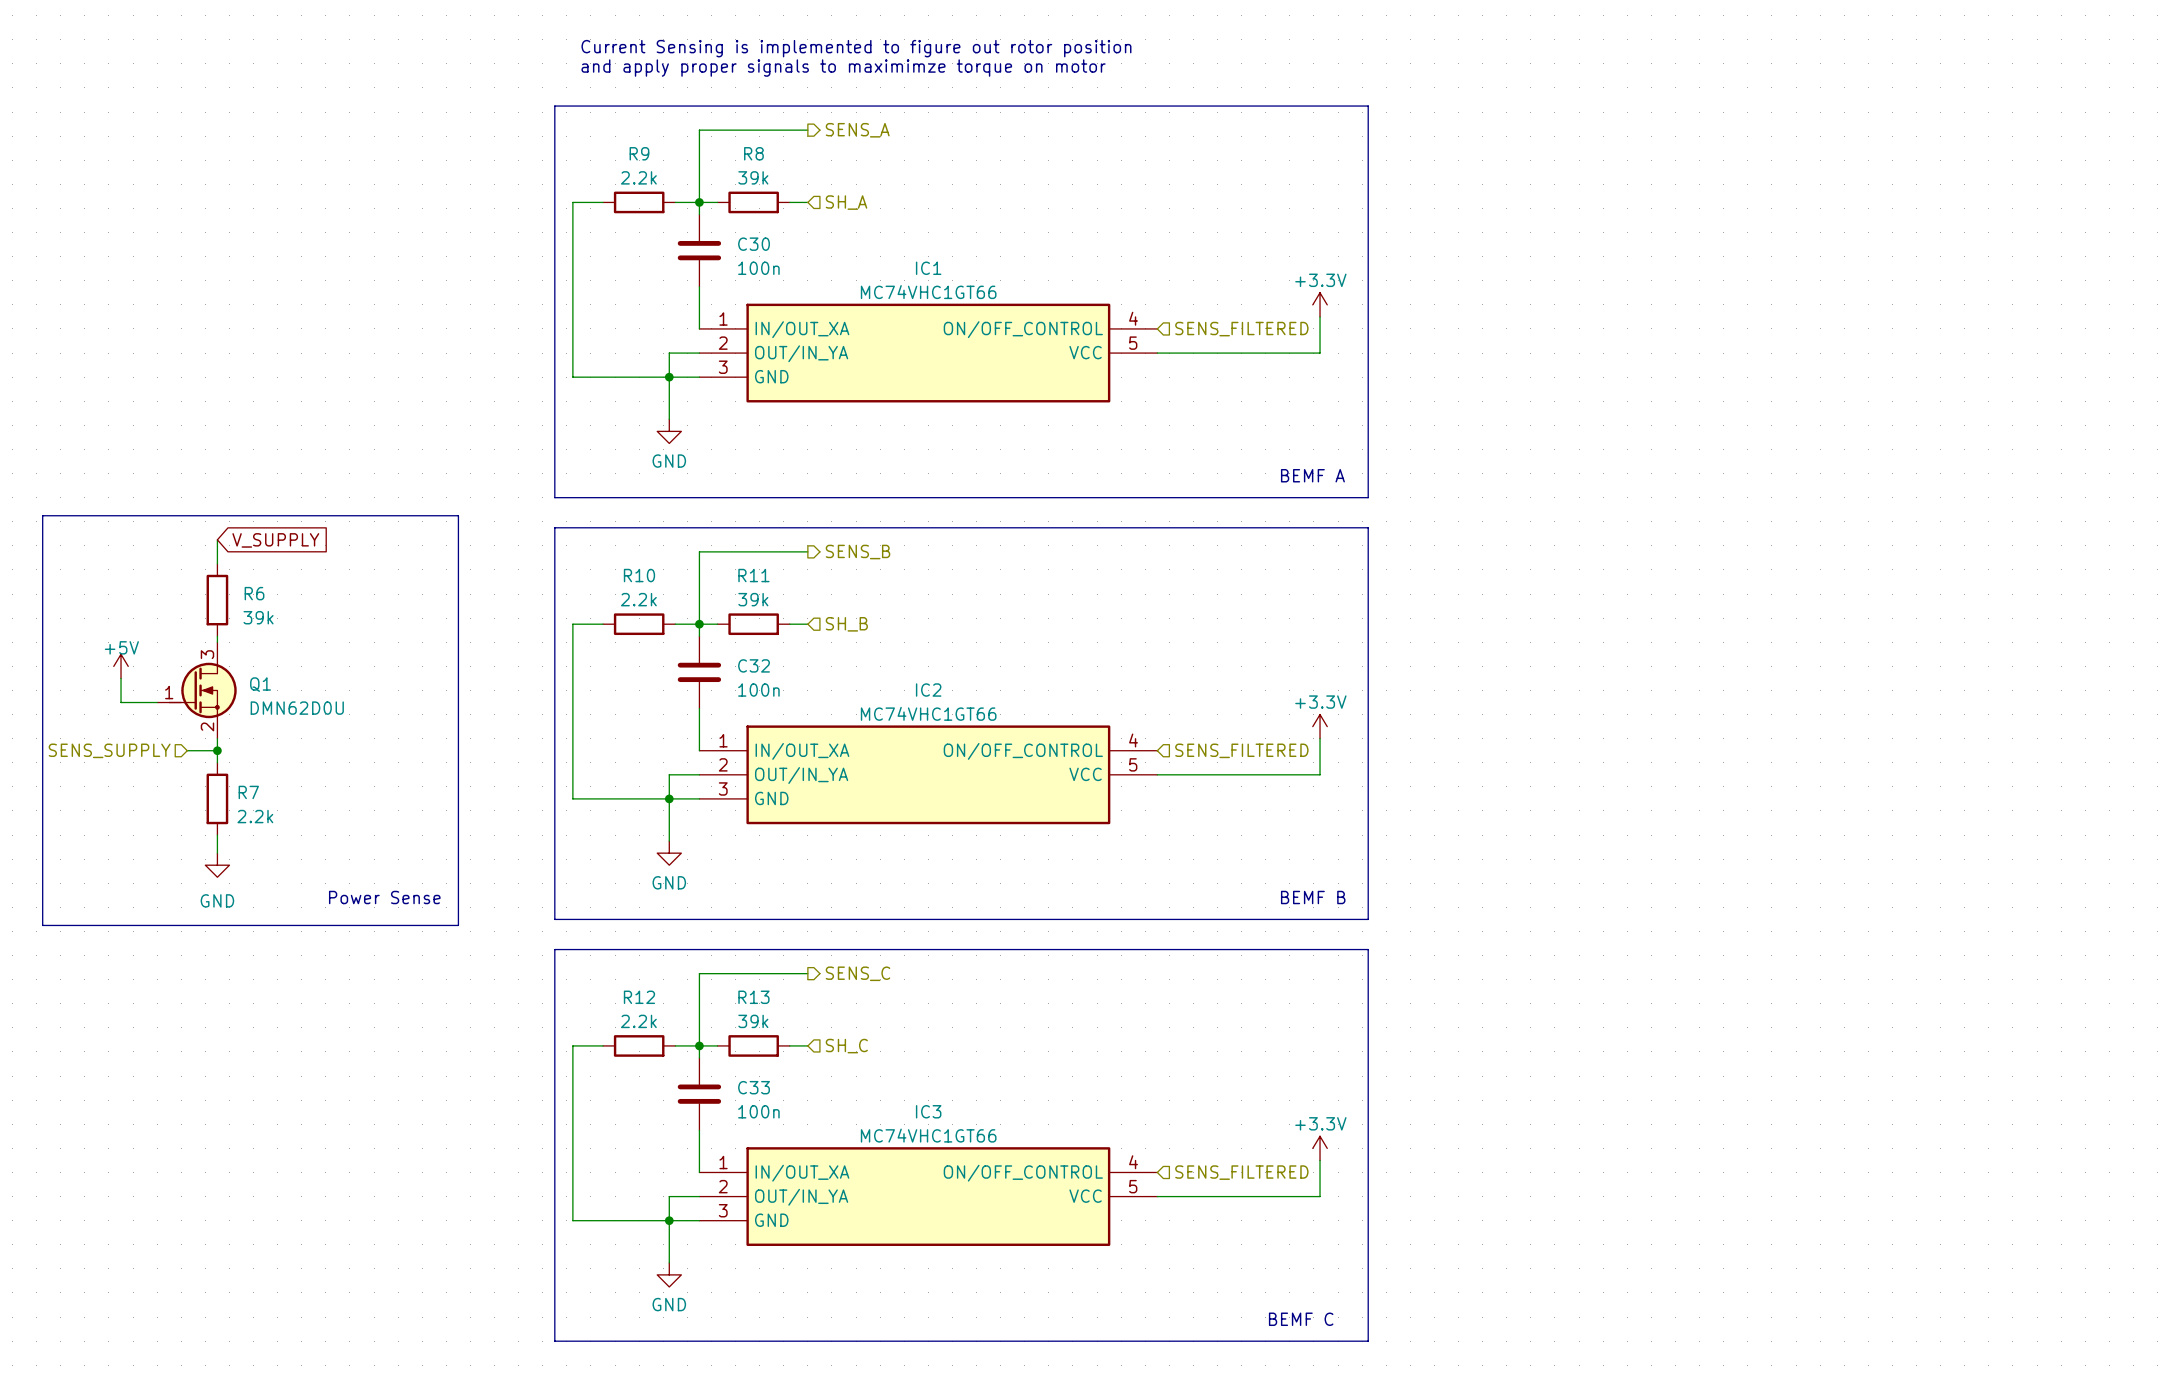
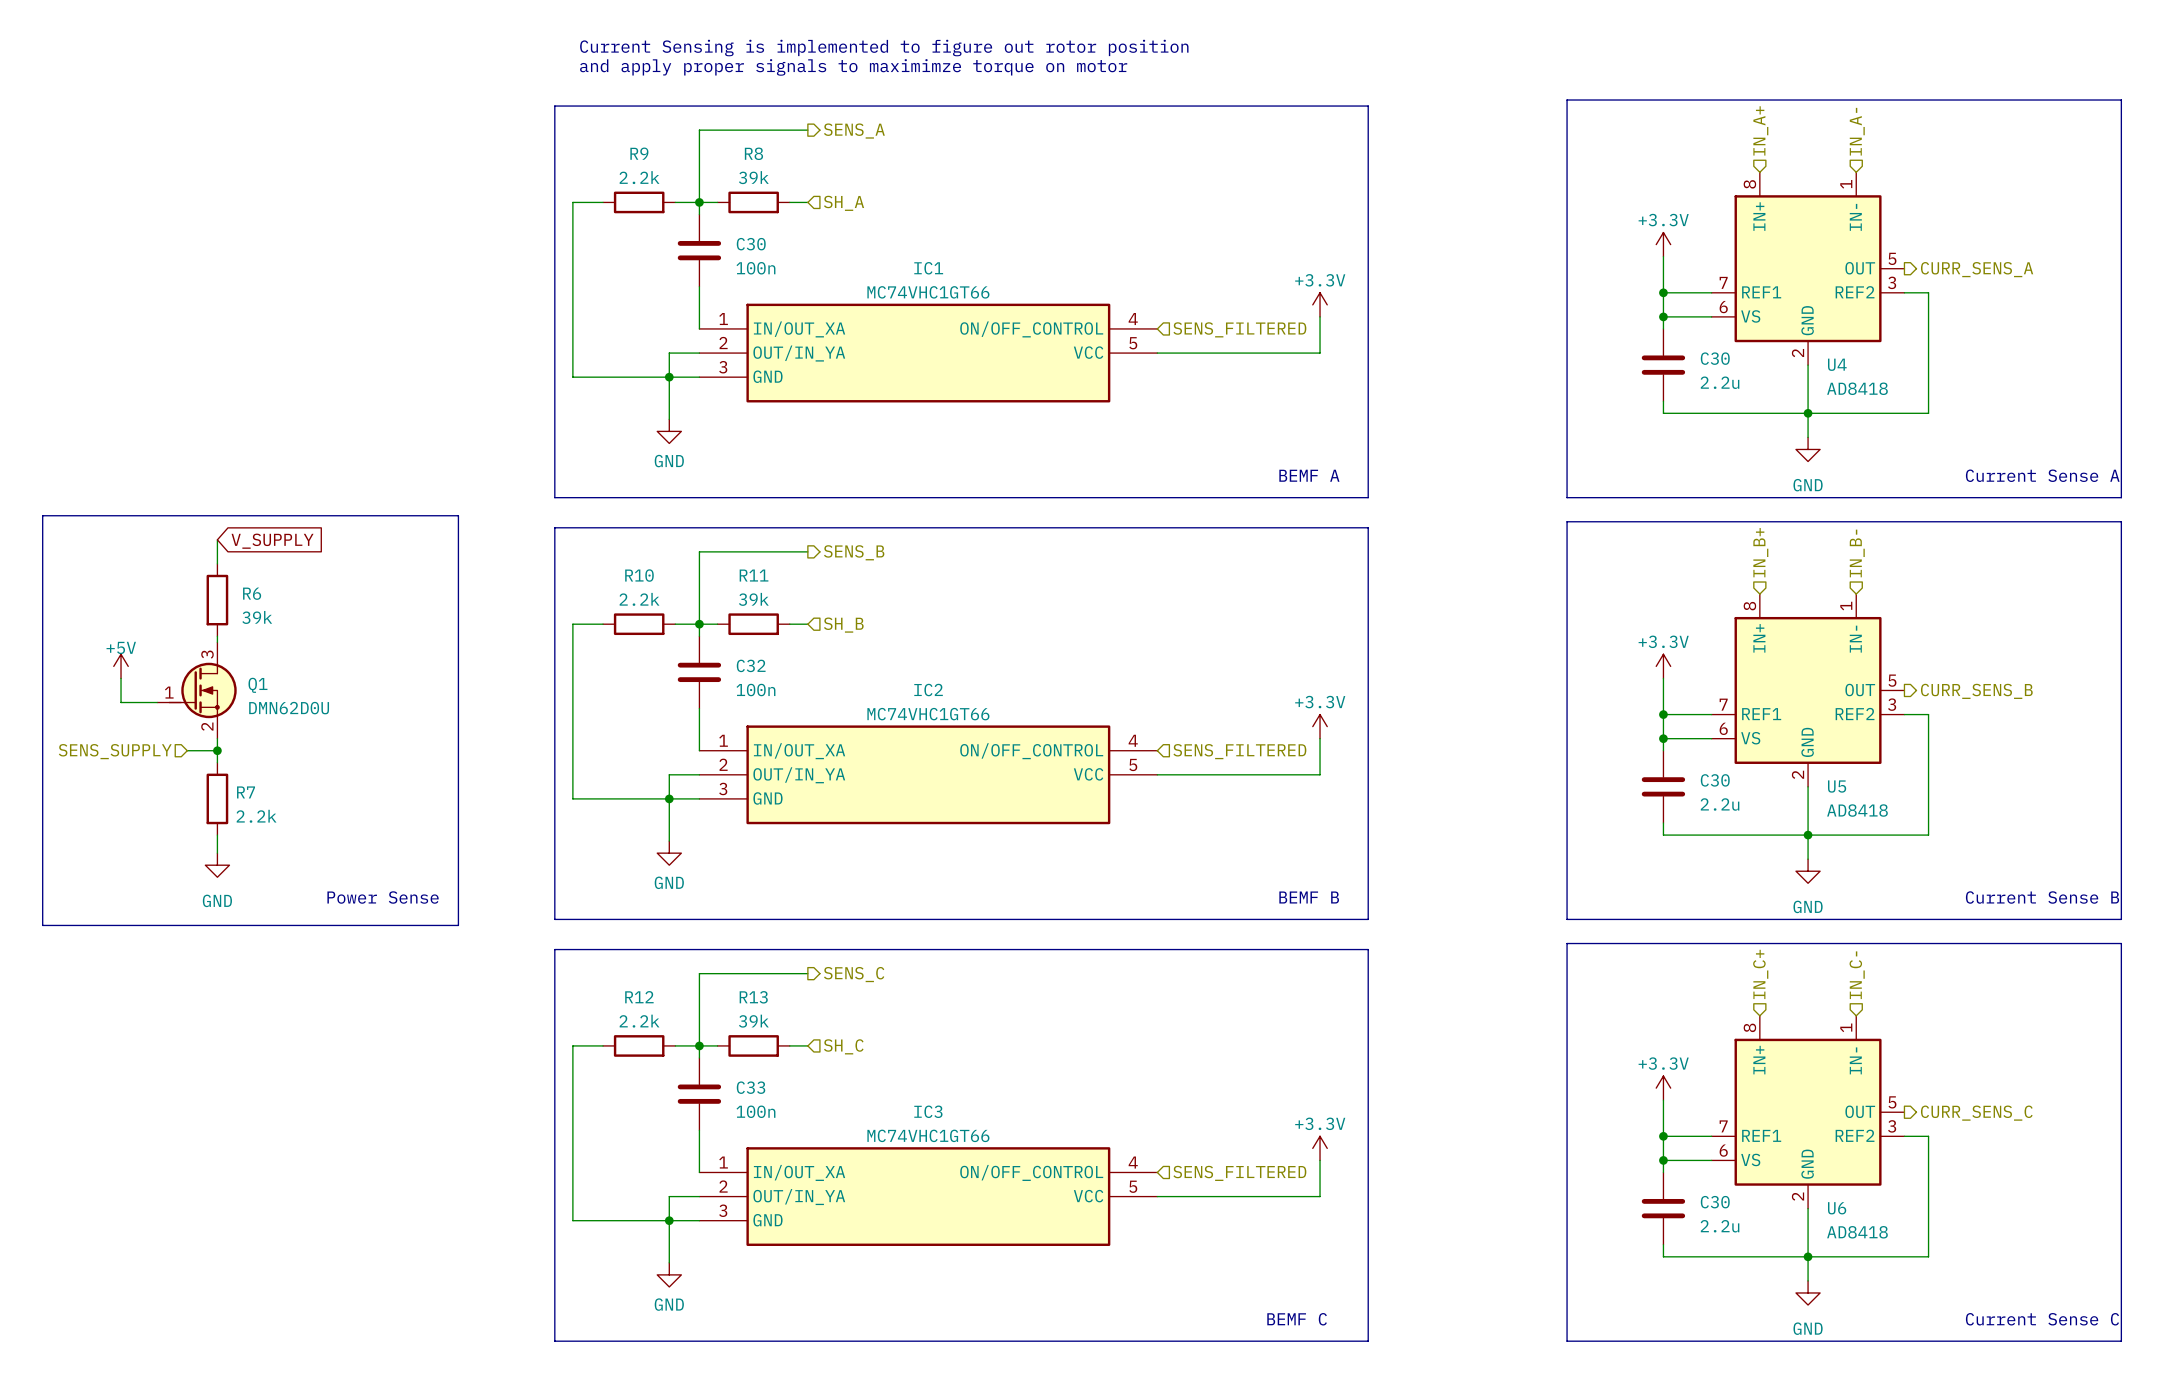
line: none -> (1567, 100) (2121, 100) (2121, 497) (1567, 497) (1567, 100)
hierarchical label: none -> IN_A+ (1760, 130)
hierarchical label: none -> IN_A- (1857, 131)
power symbol: none -> +3.3V (1663, 244)
wire: none -> (1663, 256) (1663, 328)
U4: none -> AD8418 (1808, 268)
hierarchical label: none -> CURR_SENS_A (1977, 269)
wire: none -> (1663, 292) (1711, 292)
junction: none -> (1663, 292)
wire: none -> (1904, 292) (1928, 292) (1928, 413) (1663, 413) (1663, 401)
wire: none -> (1663, 316) (1711, 316)
junction: none -> (1663, 316)
C30: none -> 2.2u (1663, 365)
wire: none -> (1808, 365) (1808, 437)
junction: none -> (1808, 413)
power symbol: none -> GND (1808, 449)
text: none -> Current Sense A (2042, 475)
line: none -> (1567, 521) (1567, 919) (2121, 919) (2121, 521) (1567, 521)
hierarchical label: none -> IN_B+ (1760, 552)
hierarchical label: none -> IN_B- (1857, 553)
power symbol: none -> +3.3V (1663, 666)
wire: none -> (1663, 678) (1663, 750)
U5: none -> AD8418 (1808, 690)
hierarchical label: none -> CURR_SENS_B (1976, 691)
wire: none -> (1663, 714) (1711, 714)
junction: none -> (1663, 714)
wire: none -> (1904, 714) (1928, 714) (1928, 835) (1663, 835) (1663, 823)
wire: none -> (1663, 738) (1711, 738)
junction: none -> (1663, 738)
C30: none -> 2.2u (1663, 786)
wire: none -> (1808, 786) (1808, 859)
junction: none -> (1808, 835)
power symbol: none -> GND (1808, 871)
text: none -> Current Sense B (2042, 897)
line: none -> (1567, 943) (1567, 1341) (2121, 1341) (2121, 943) (1567, 943)
hierarchical label: none -> IN_C+ (1760, 974)
hierarchical label: none -> IN_C- (1857, 975)
power symbol: none -> +3.3V (1663, 1088)
wire: none -> (1663, 1100) (1663, 1172)
U6: none -> AD8418 (1808, 1112)
hierarchical label: none -> CURR_SENS_C (1976, 1113)
wire: none -> (1663, 1136) (1711, 1136)
junction: none -> (1663, 1136)
wire: none -> (1904, 1136) (1928, 1136) (1928, 1256) (1663, 1256) (1663, 1244)
wire: none -> (1663, 1160) (1711, 1160)
junction: none -> (1663, 1160)
C30: none -> 2.2u (1663, 1208)
wire: none -> (1808, 1208) (1808, 1280)
junction: none -> (1808, 1256)
power symbol: none -> GND (1808, 1292)
text: none -> Current Sense C (2042, 1319)

